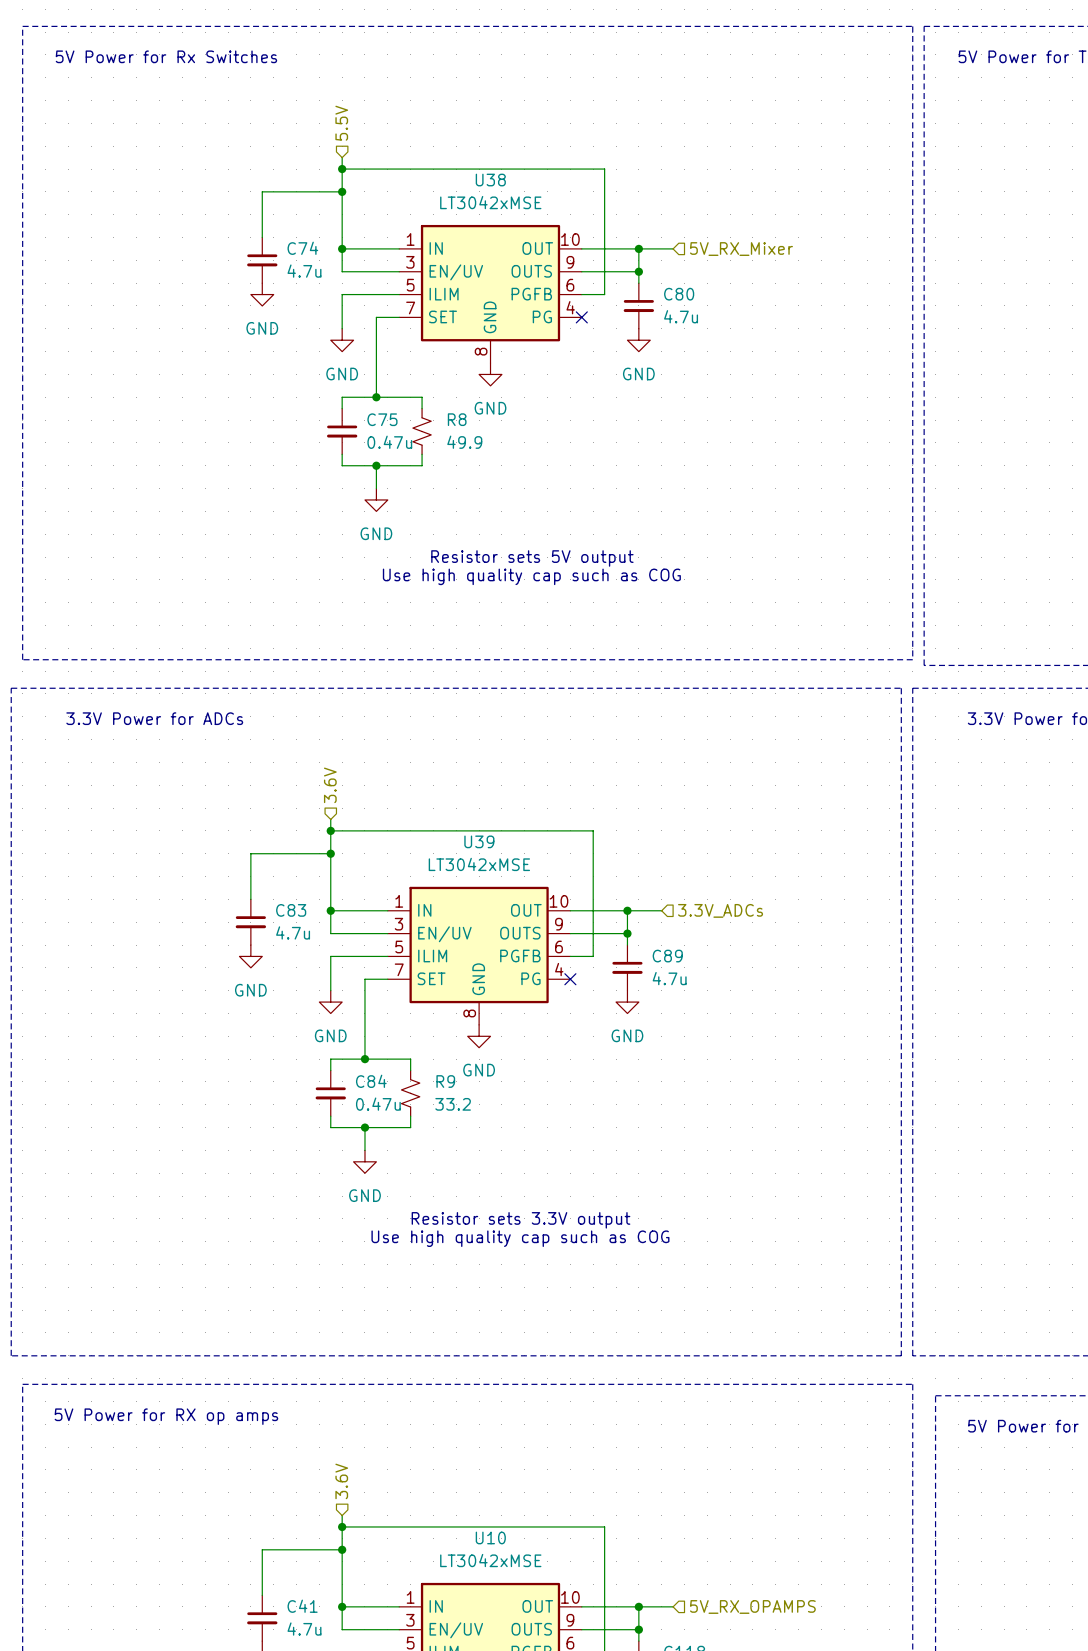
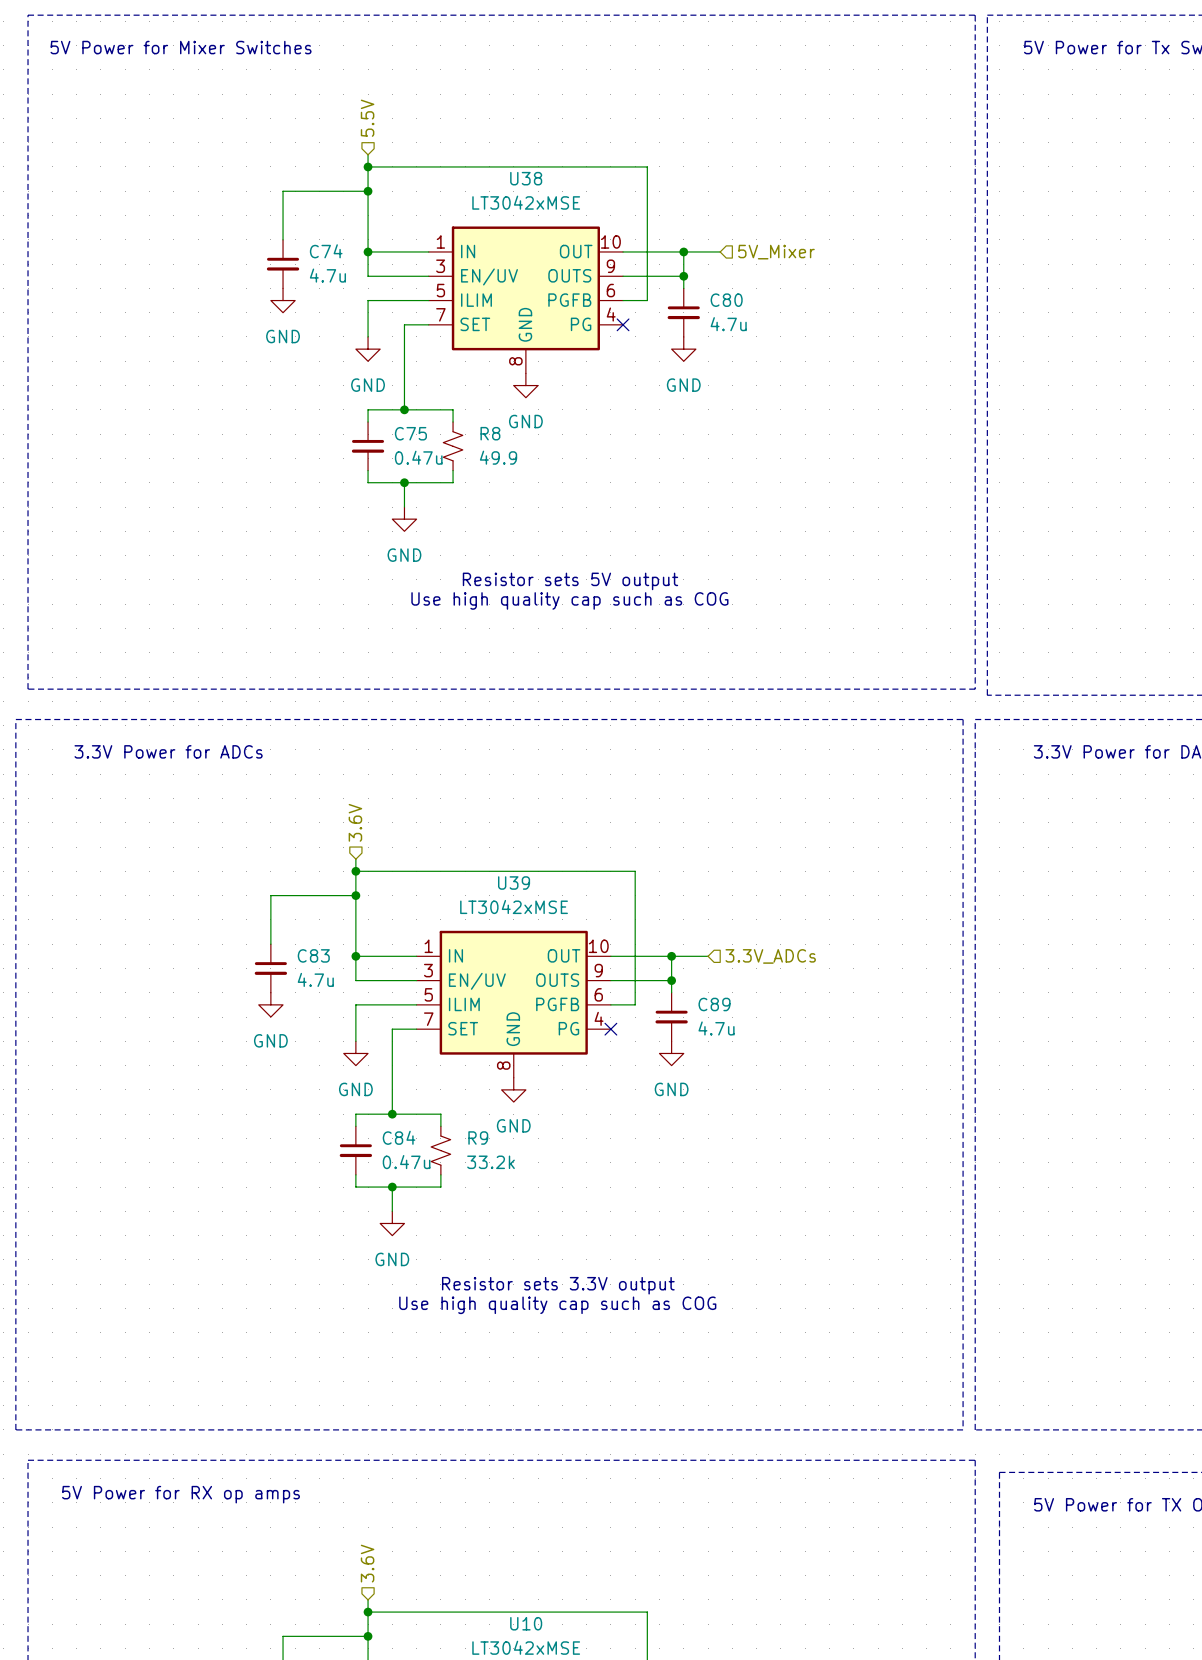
text: 5V Power for Rx Switches (166, 56) -> 5V Power for Mixer Switches (181, 47)
hierarchical label: 5V_RX_Mixer (741, 249) -> 5V_Mixer (776, 252)
R9 value: 33.2 (453, 1104) -> 33.2k (491, 1162)

